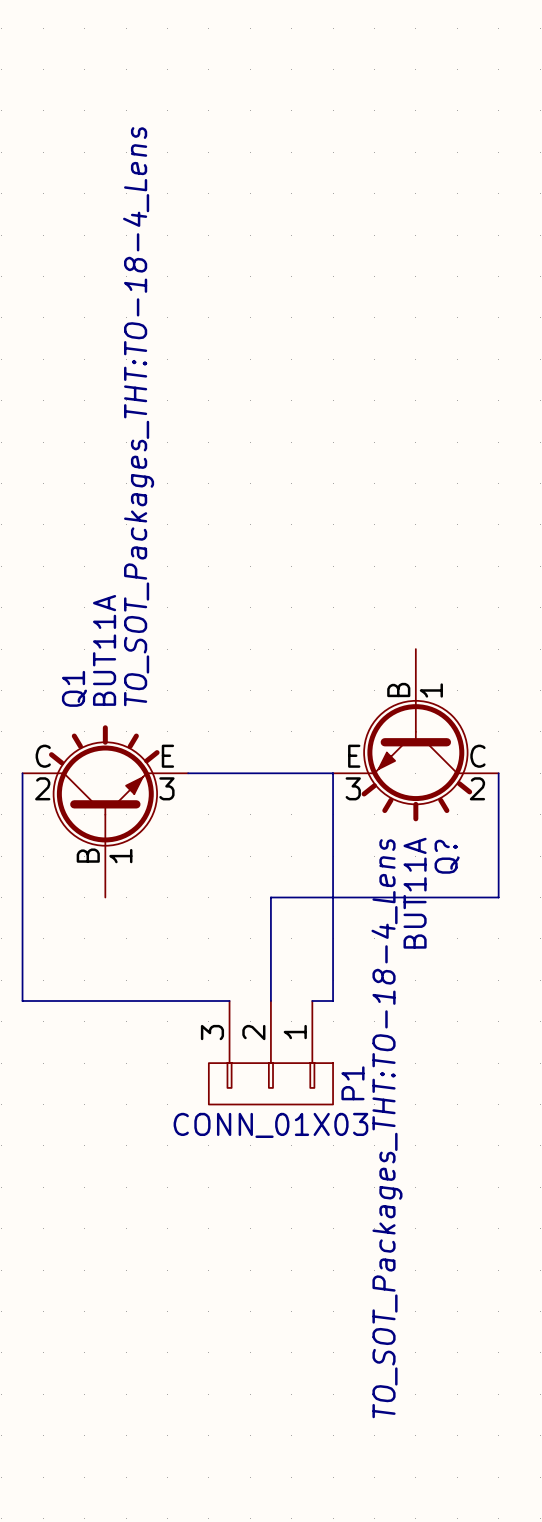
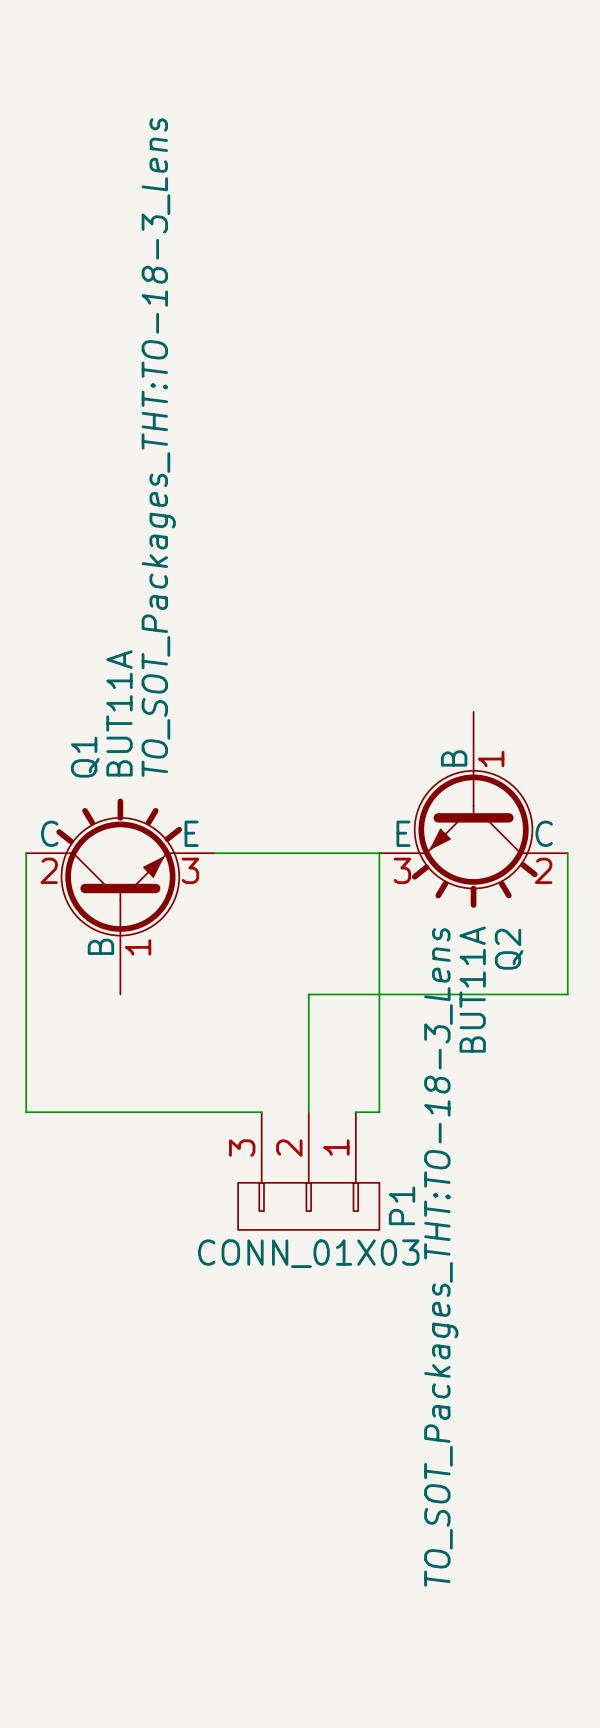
Q1 text: TO_SOT_Packages_THT:TO-18-4_Lens (138, 416) -> TO_SOT_Packages_THT:TO-18-3_Lens (158, 447)
Q? name: Q? (447, 856) -> Q2 (509, 949)
Q? text: TO_SOT_Packages_THT:TO-18-4_Lens (386, 1128) -> TO_SOT_Packages_THT:TO-18-3_Lens (441, 1257)

